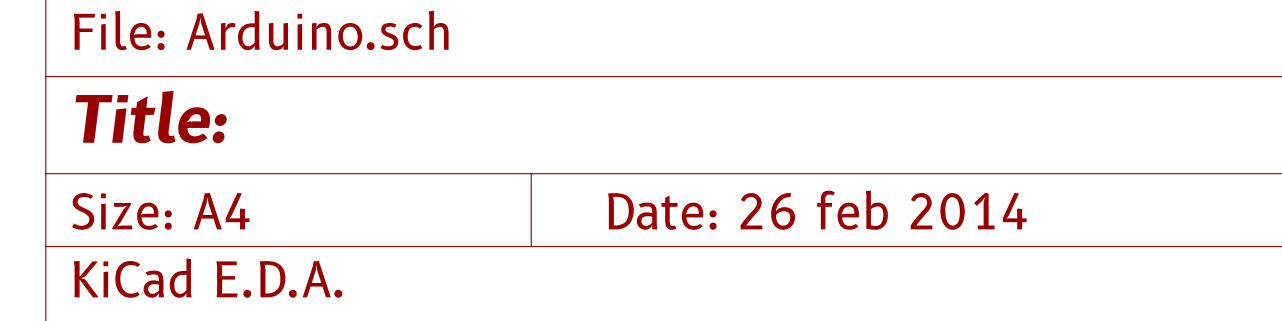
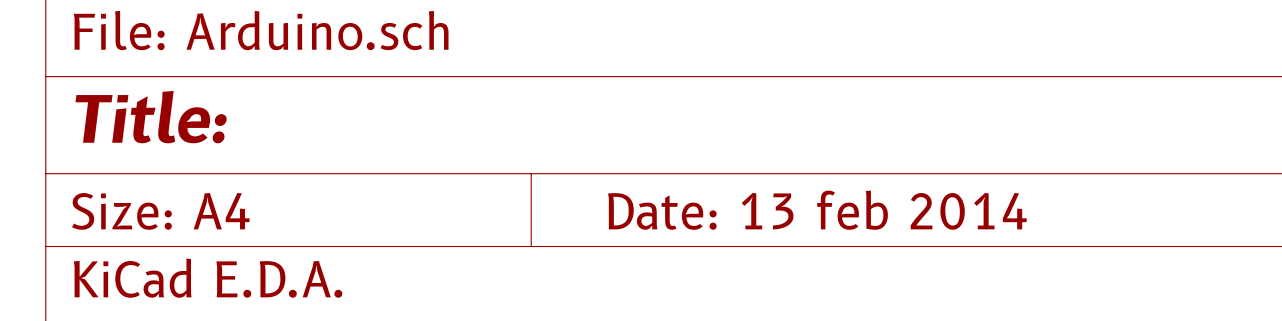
title block: Date: 26 feb 2014 (817, 210) -> Date: 13 feb 2014 (817, 210)

